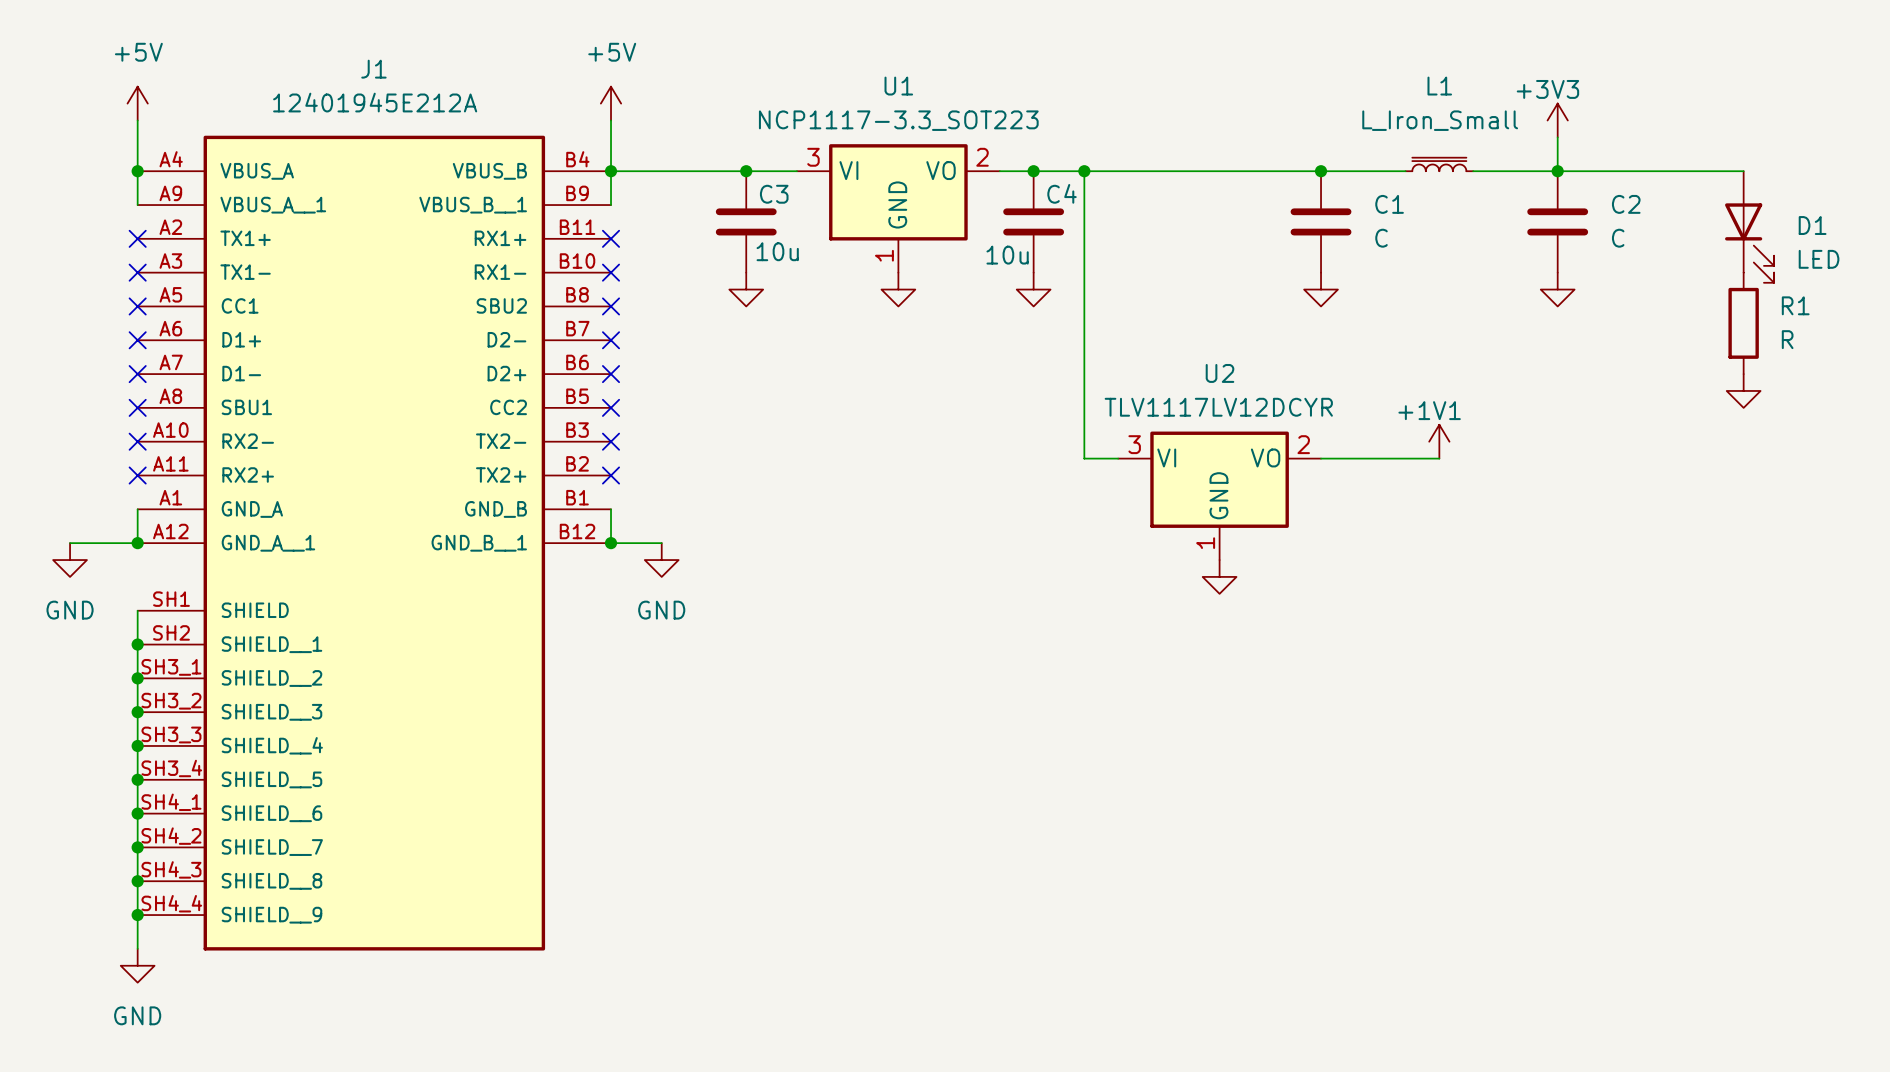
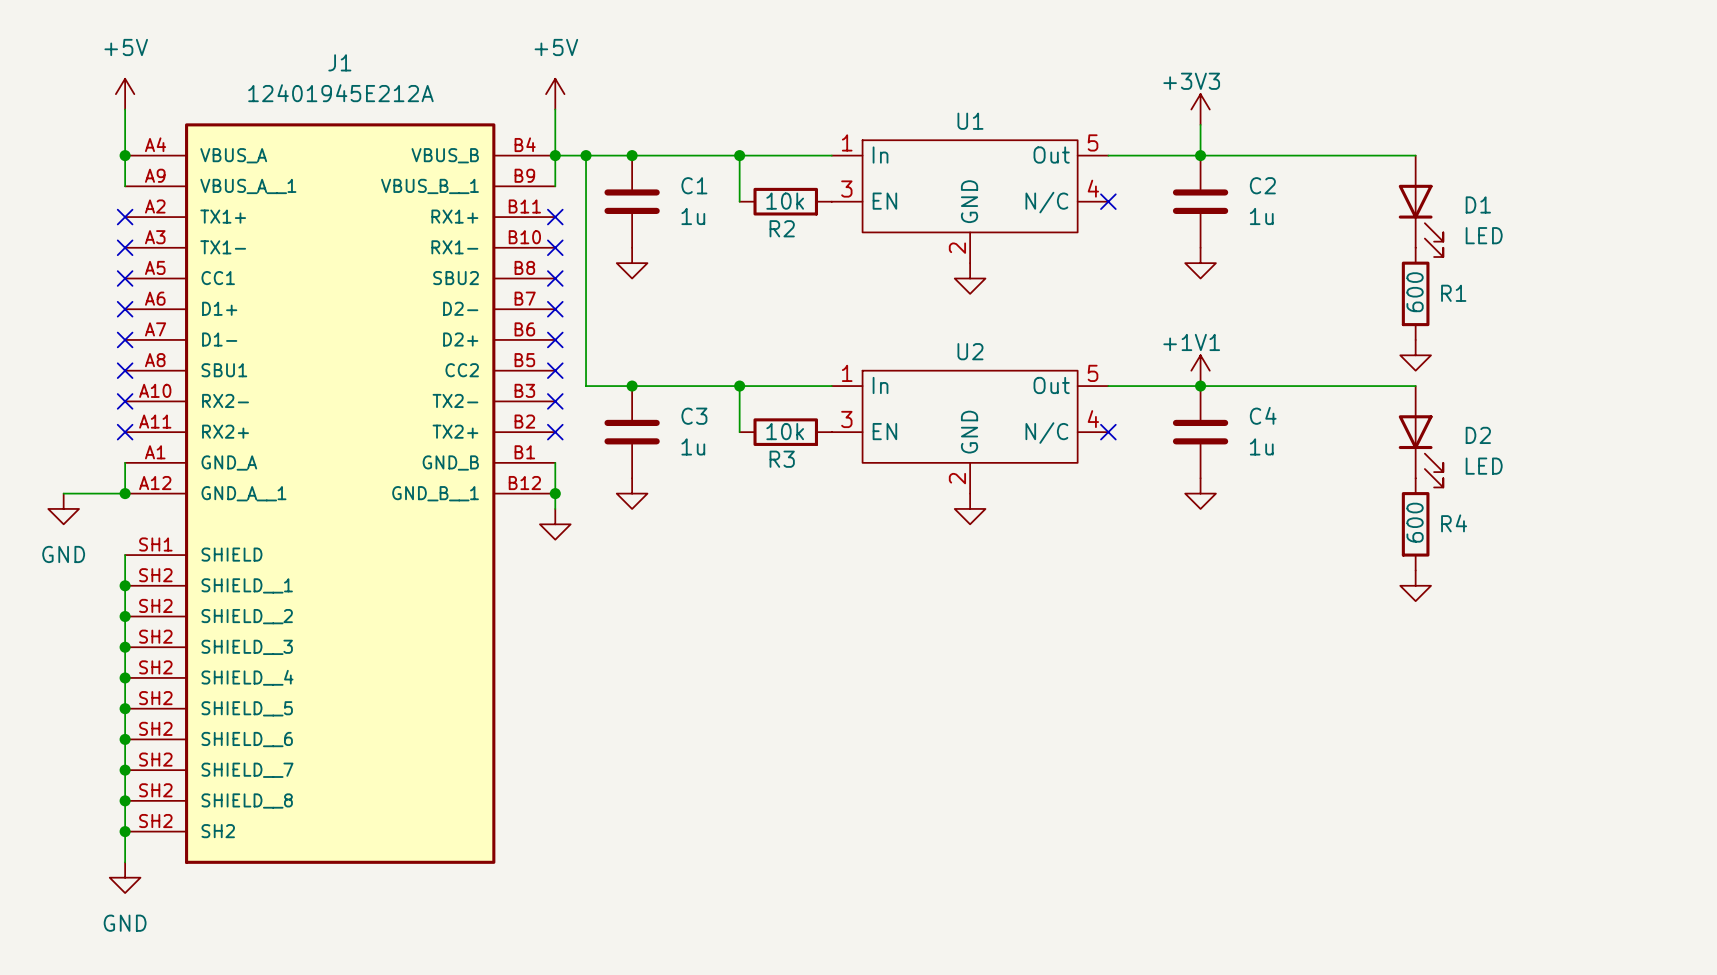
U1 name position: U1 (898, 86) -> U1 (970, 121)
U1 value: NCP1117-3.3_SOT223 (898, 120) -> none
power symbol position: +3V3 (1557, 120) -> +3V3 (1200, 109)
J1 symbol: [137, 135, 612, 951] -> [125, 123, 556, 864]
wire: none -> (1200, 124) (1200, 155)
wire: (1557, 137) (1557, 171) (1743, 171) -> none
U1 symbol: [796, 144, 1000, 273] -> [831, 140, 1109, 264]
L1: L_Iron_Small (1439, 164) -> none
wire: none -> (586, 155) (586, 386) (831, 386)
junction: none -> (586, 155)
junction: none -> (632, 155)
junction: (746, 171) -> none
wire: none -> (739, 155) (739, 201)
junction: none -> (739, 155)
wire: (999, 171) (1219, 171) -> none
junction: (1033, 171) -> none
wire: (1084, 171) (1084, 458) (1118, 458) -> none
junction: (1084, 171) -> none
wire: none -> (1277, 155) (1338, 155)
junction: (1557, 171) -> none
C4 name position: C4 (1062, 193) -> C4 (1263, 415)
C3 name position: C3 (774, 194) -> C3 (694, 416)
C1 name: C1 (1389, 204) -> C2 (1262, 185)
C1: none -> 1u (632, 201)
C3 position: (746, 221) -> (632, 432)
R2: none -> 10k (785, 201)
C4 position: (1033, 221) -> (1200, 432)
no-connect mark: none -> (1108, 201)
C2: C (1557, 221) -> none
D1 position: (1749, 227) -> (1421, 206)
C1 value: C (1381, 238) -> 1u (1261, 216)
C3 value: 10u (777, 251) -> 1u (693, 446)
C4 value: 10u (1007, 255) -> 1u (1261, 446)
power symbol position: (746, 289) -> (632, 263)
power symbol: (898, 289) -> none
power symbol position: (1033, 289) -> (970, 278)
power symbol: (1557, 289) -> none
R1 name position: R1 (1795, 305) -> R1 (1453, 293)
R1 position: (1743, 323) -> (1415, 293)
R1 value: R (1787, 339) -> 600 (1415, 292)
U2 name position: U2 (1219, 373) -> U2 (970, 351)
power symbol: none -> (1415, 355)
power symbol: (1743, 390) -> none
U2 value: TLV1117LV12DCYR (1218, 407) -> none
junction: none -> (632, 386)
wire: none -> (739, 386) (739, 432)
junction: none -> (739, 386)
wire: none -> (1108, 386) (1415, 386)
junction: none -> (1200, 386)
U2 symbol: [1118, 431, 1322, 561] -> [831, 370, 1109, 494]
power symbol position: +1V1 (1439, 441) -> +1V1 (1200, 370)
wire: (1321, 458) (1439, 458) -> none
R3: none -> 10k (785, 432)
no-connect mark: none -> (1108, 432)
D2: none -> LED (1421, 436)
wire: (611, 543) (661, 543) -> (555, 493) (555, 508)
power symbol: none -> (632, 493)
power symbol: none -> (1200, 493)
power symbol: GND (661, 560) -> none
power symbol: none -> (970, 508)
power symbol: none -> (555, 524)
power symbol: (1219, 576) -> none
R4: none -> 600 (1415, 524)
power symbol: none -> (1415, 585)

